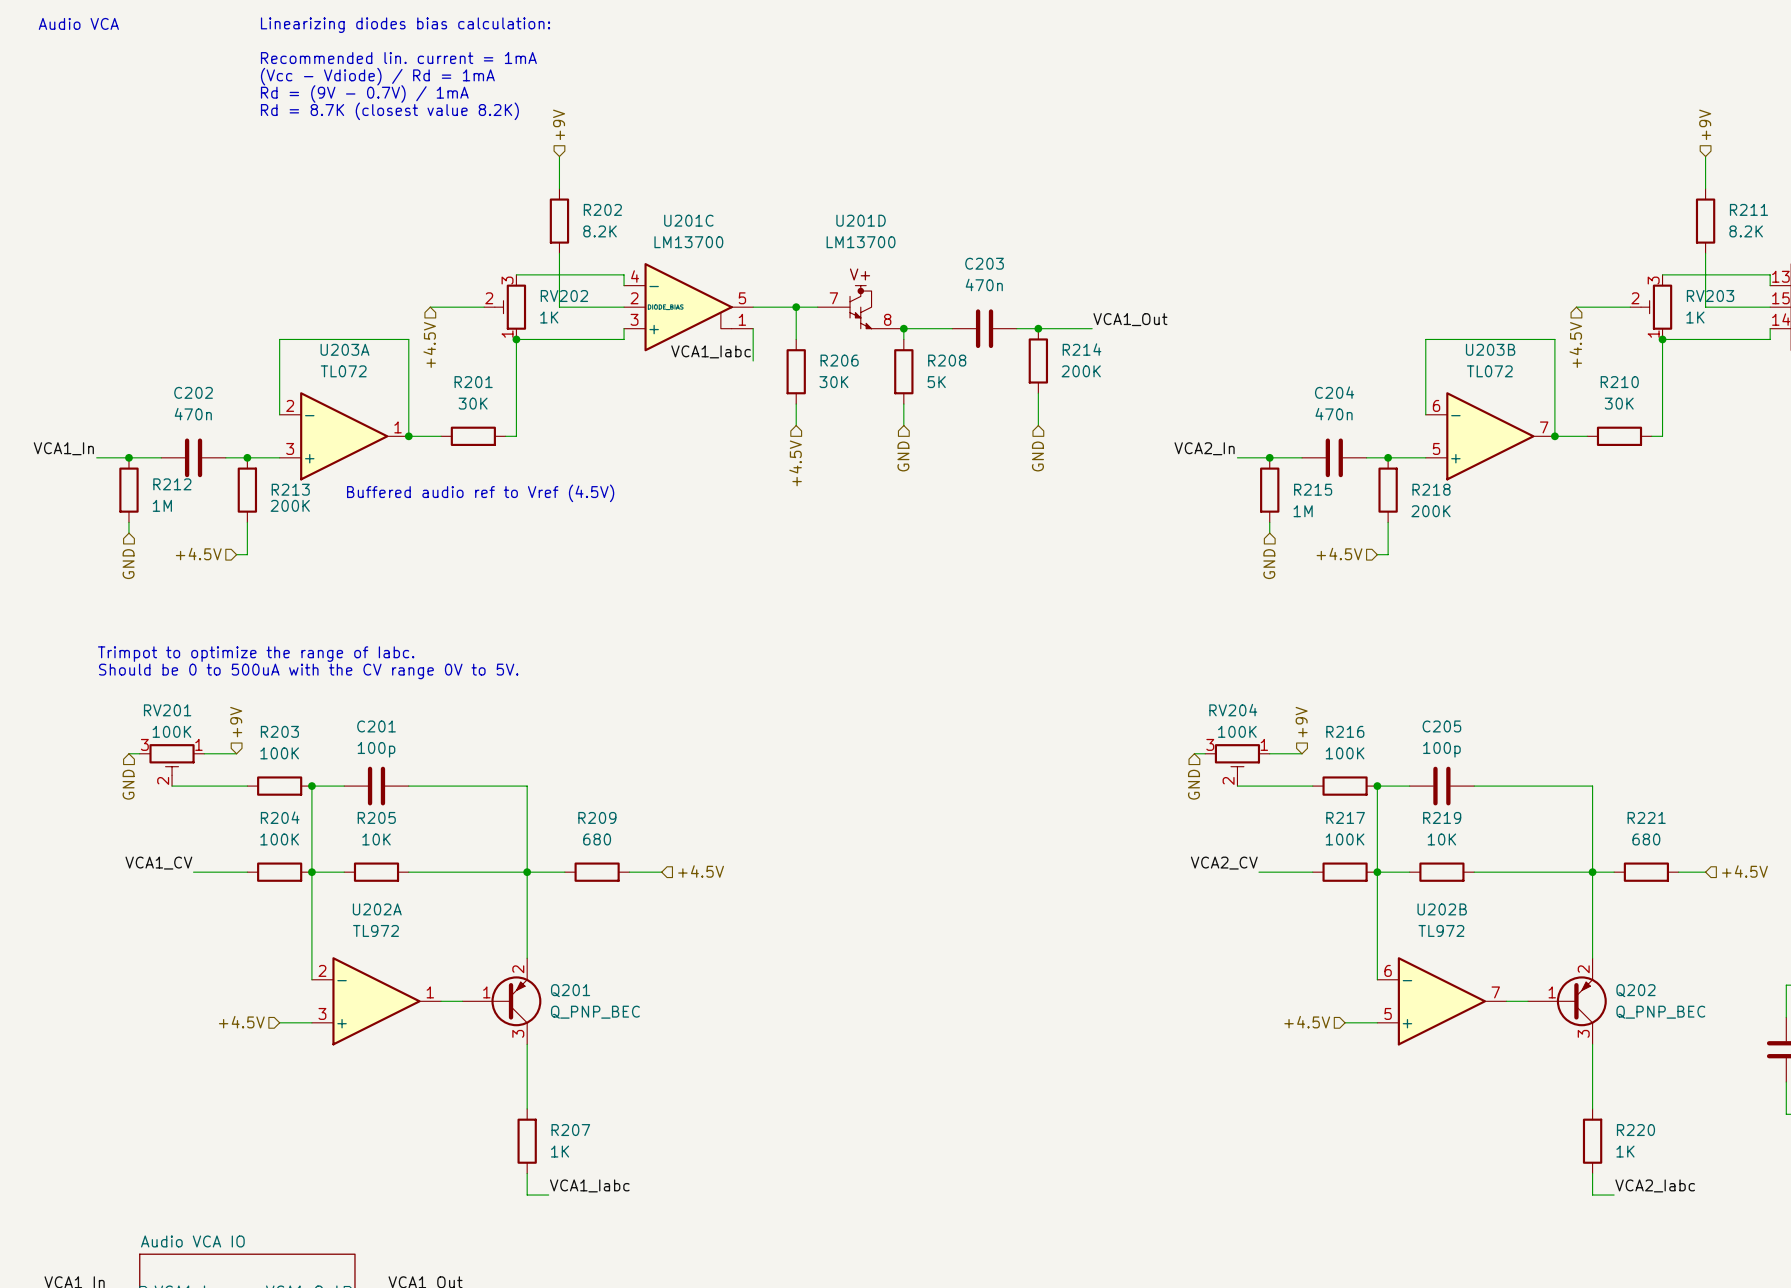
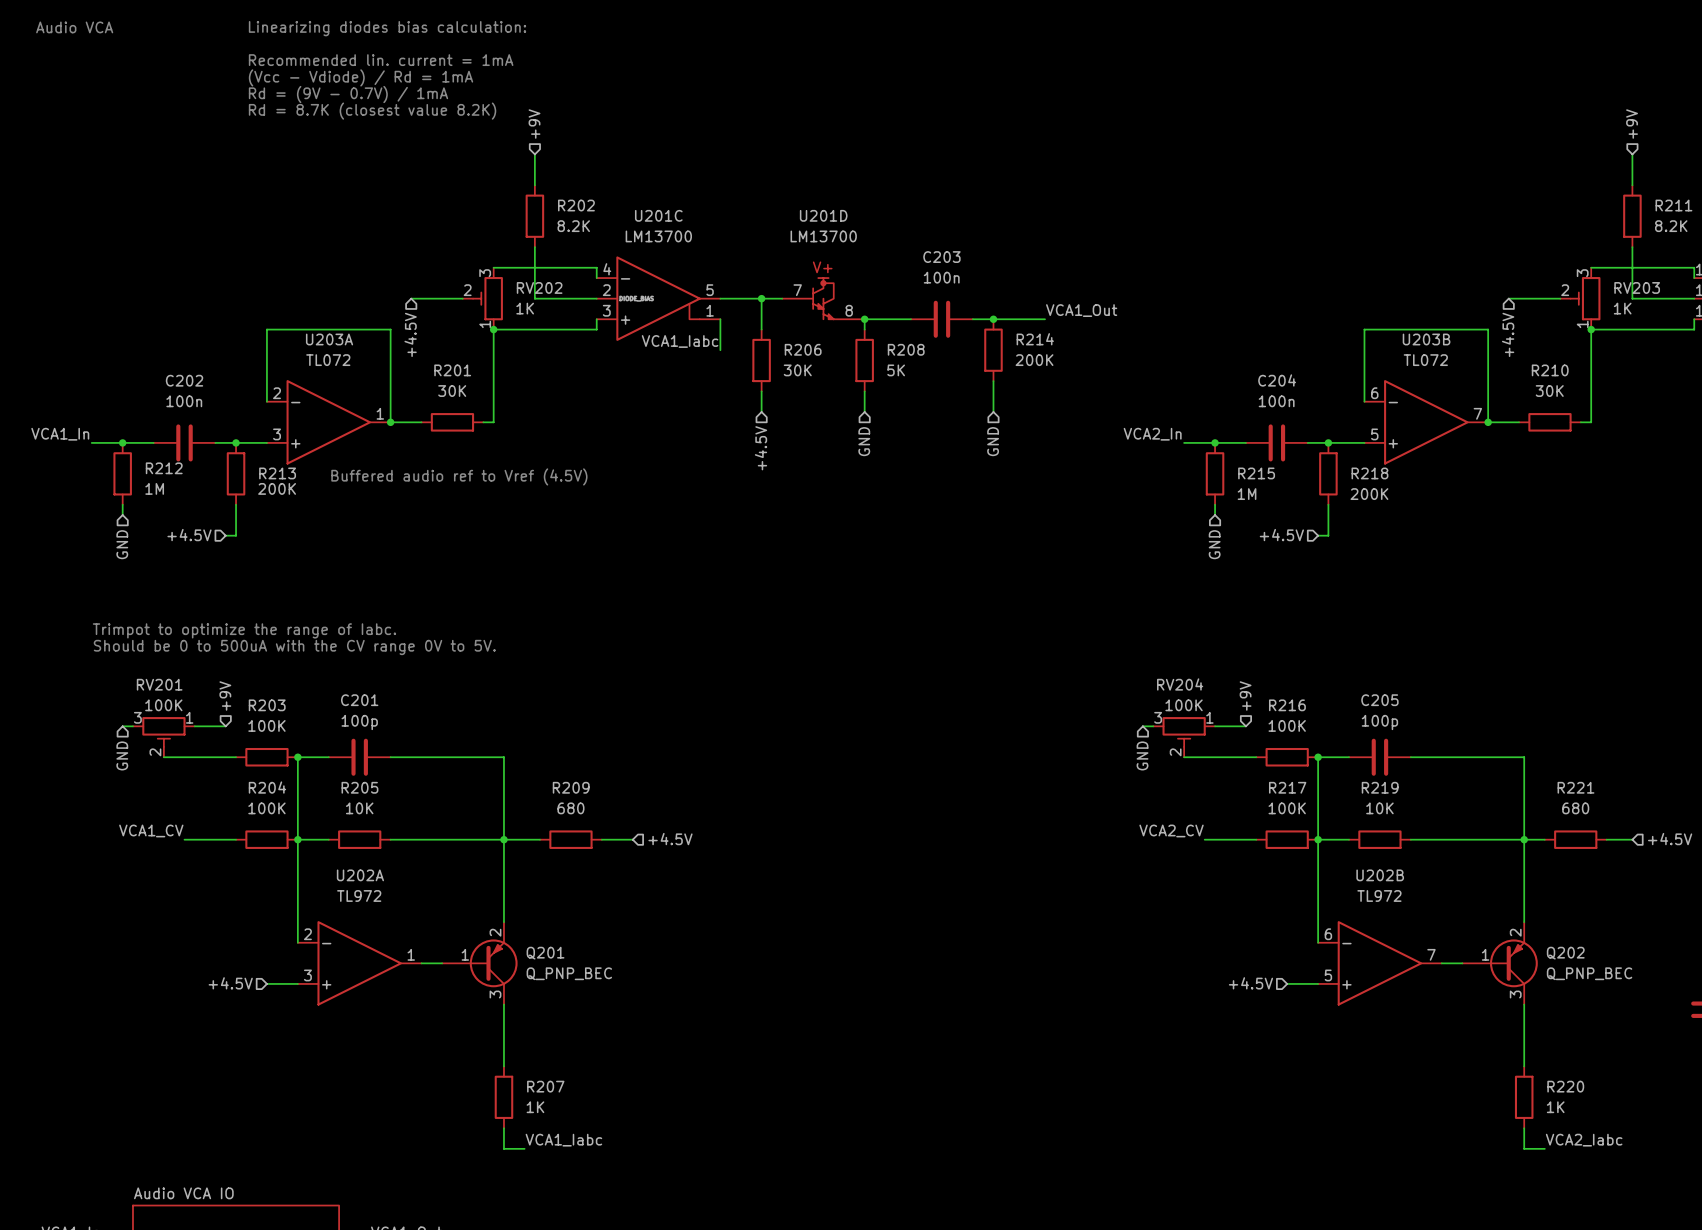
C203 value: 470n (984, 284) -> 100n (941, 277)
C202 value: 470n (193, 414) -> 100n (184, 401)
C204 value: 470n (1334, 414) -> 100n (1276, 401)

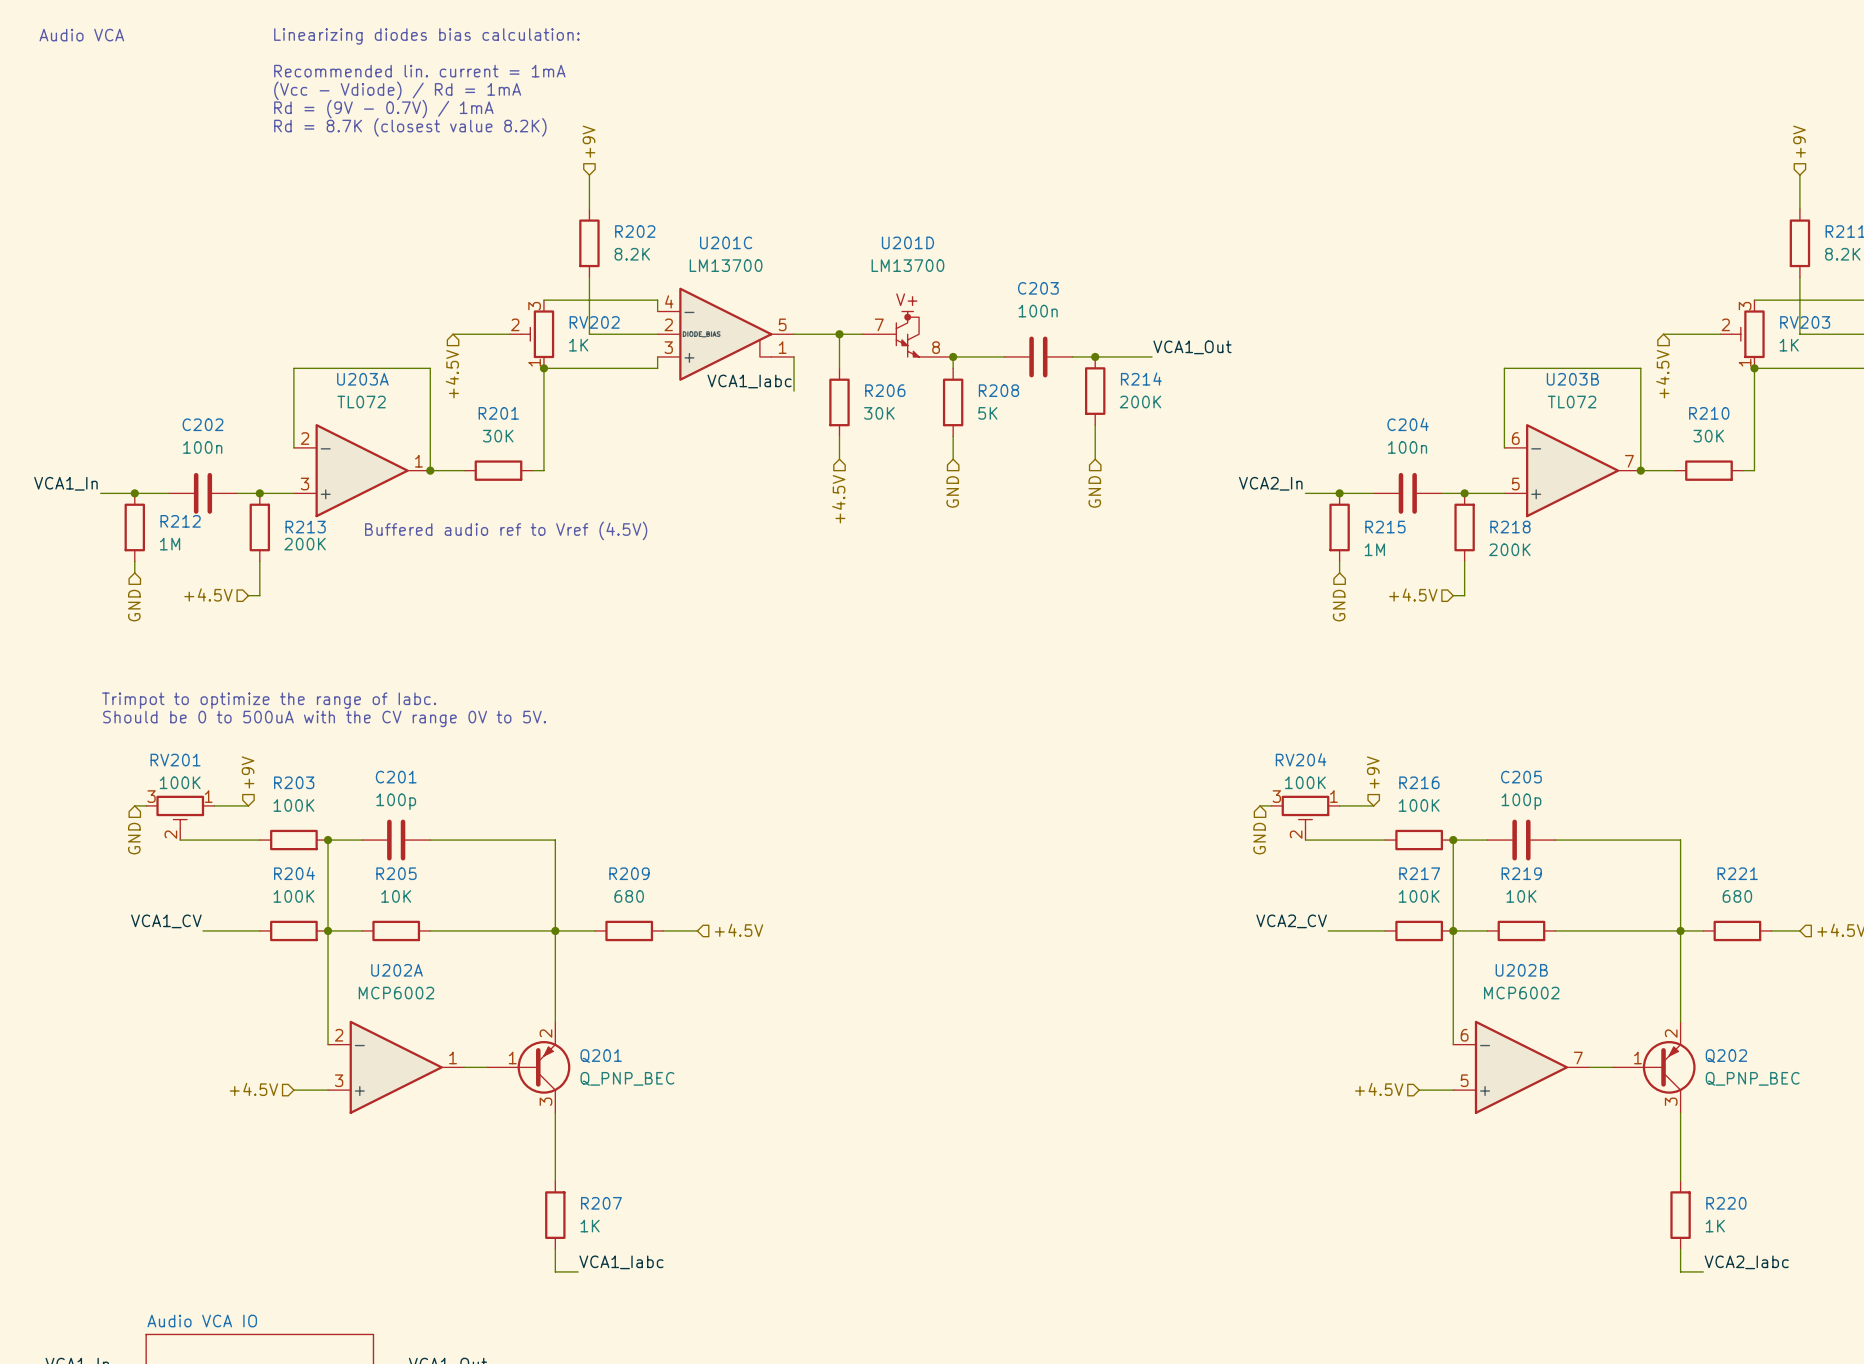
U202A value: TL972 (359, 895) -> MCP6002 (396, 993)
U202B value: TL972 (1379, 895) -> MCP6002 (1521, 993)

